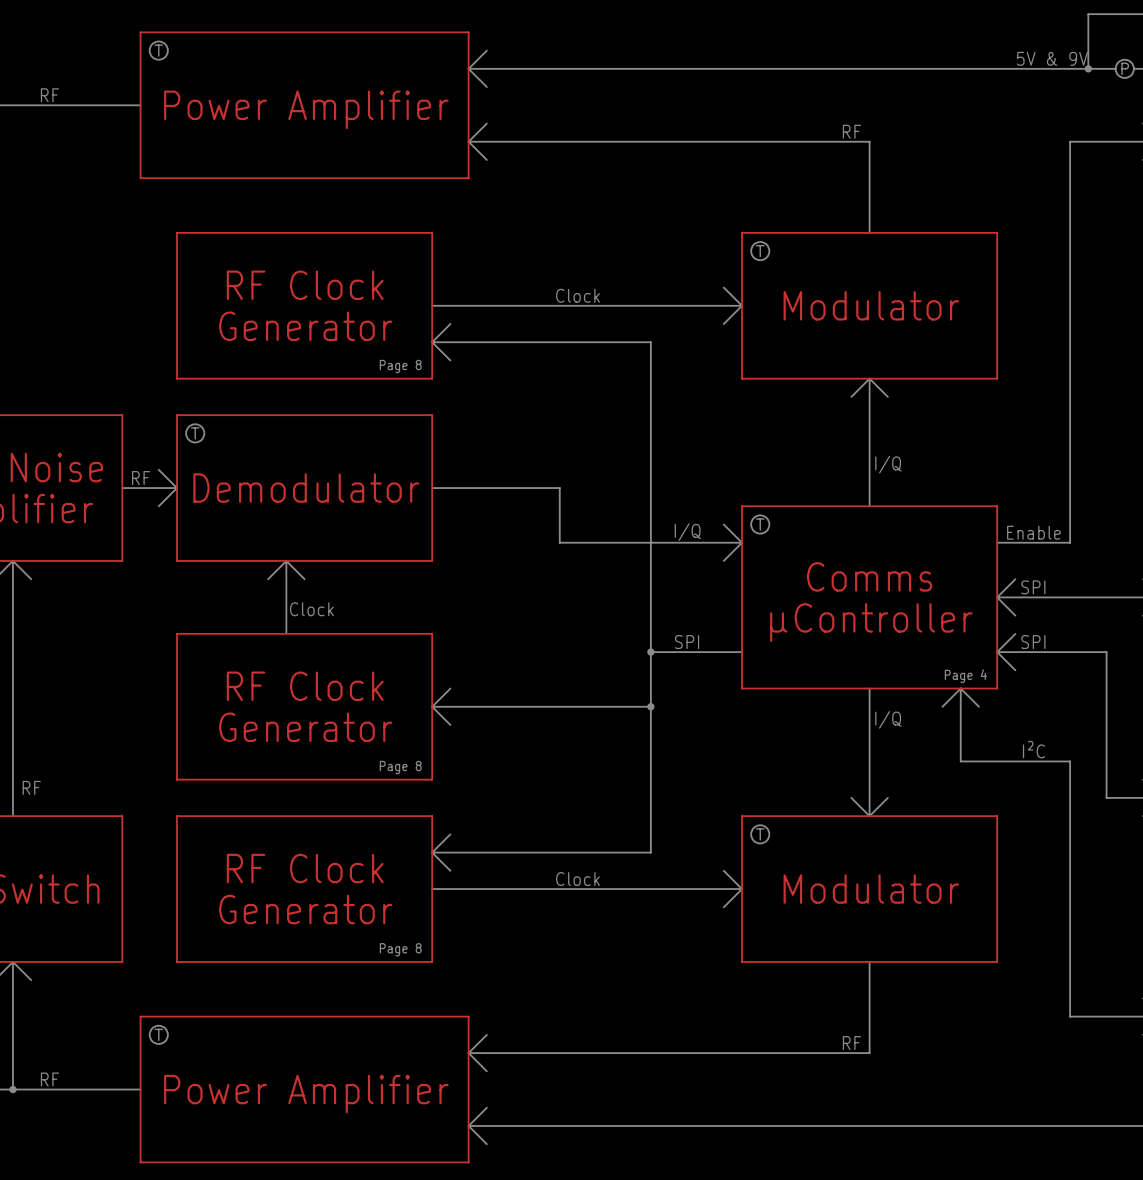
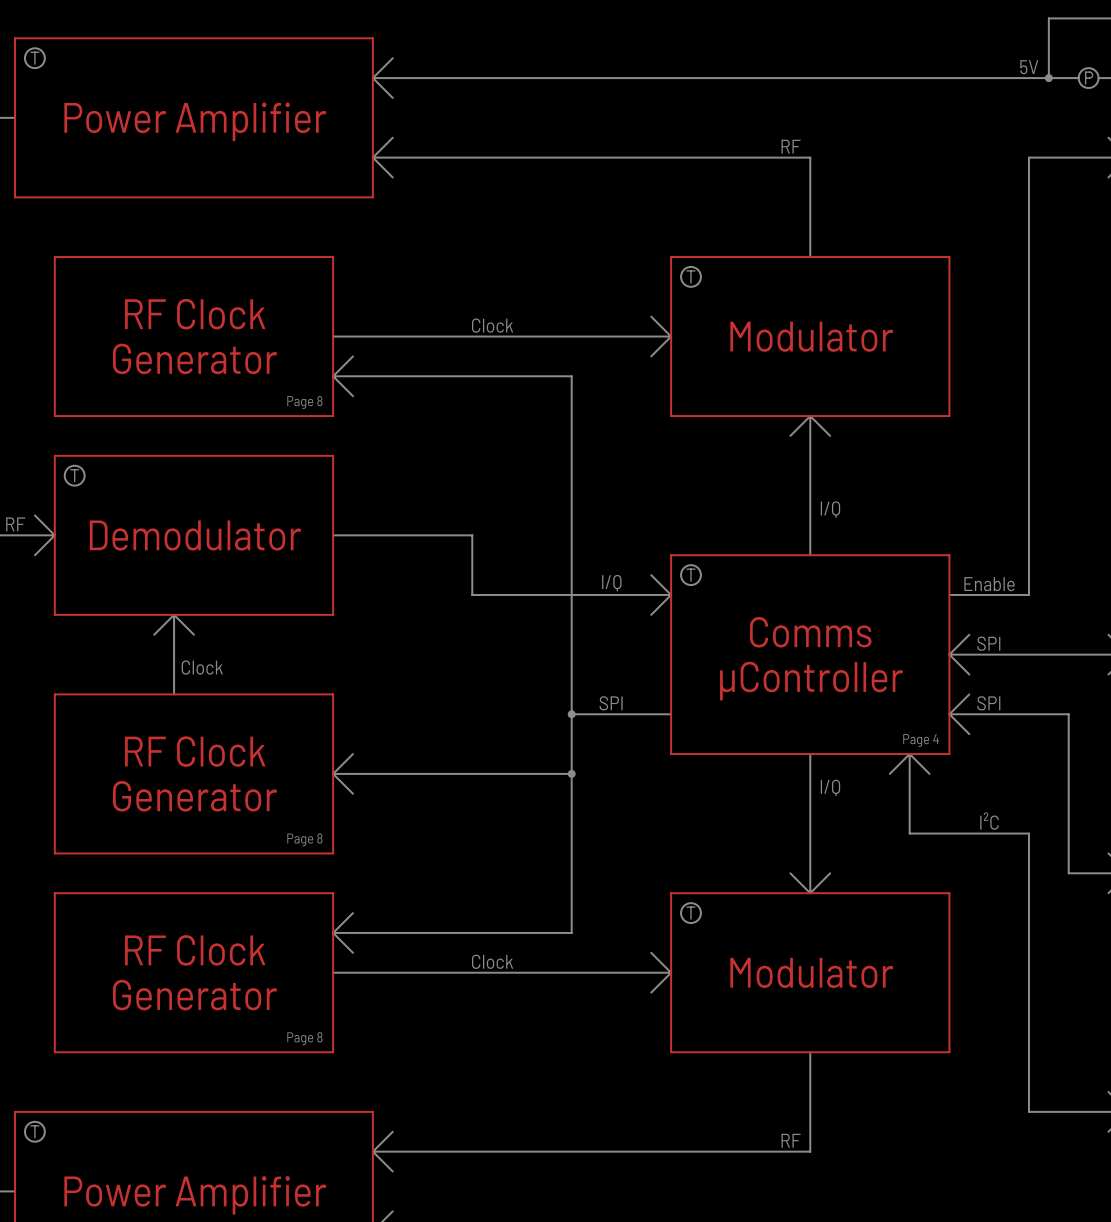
text: 5V & 9V (1052, 58) -> none
text: none -> 5V (1029, 67)

